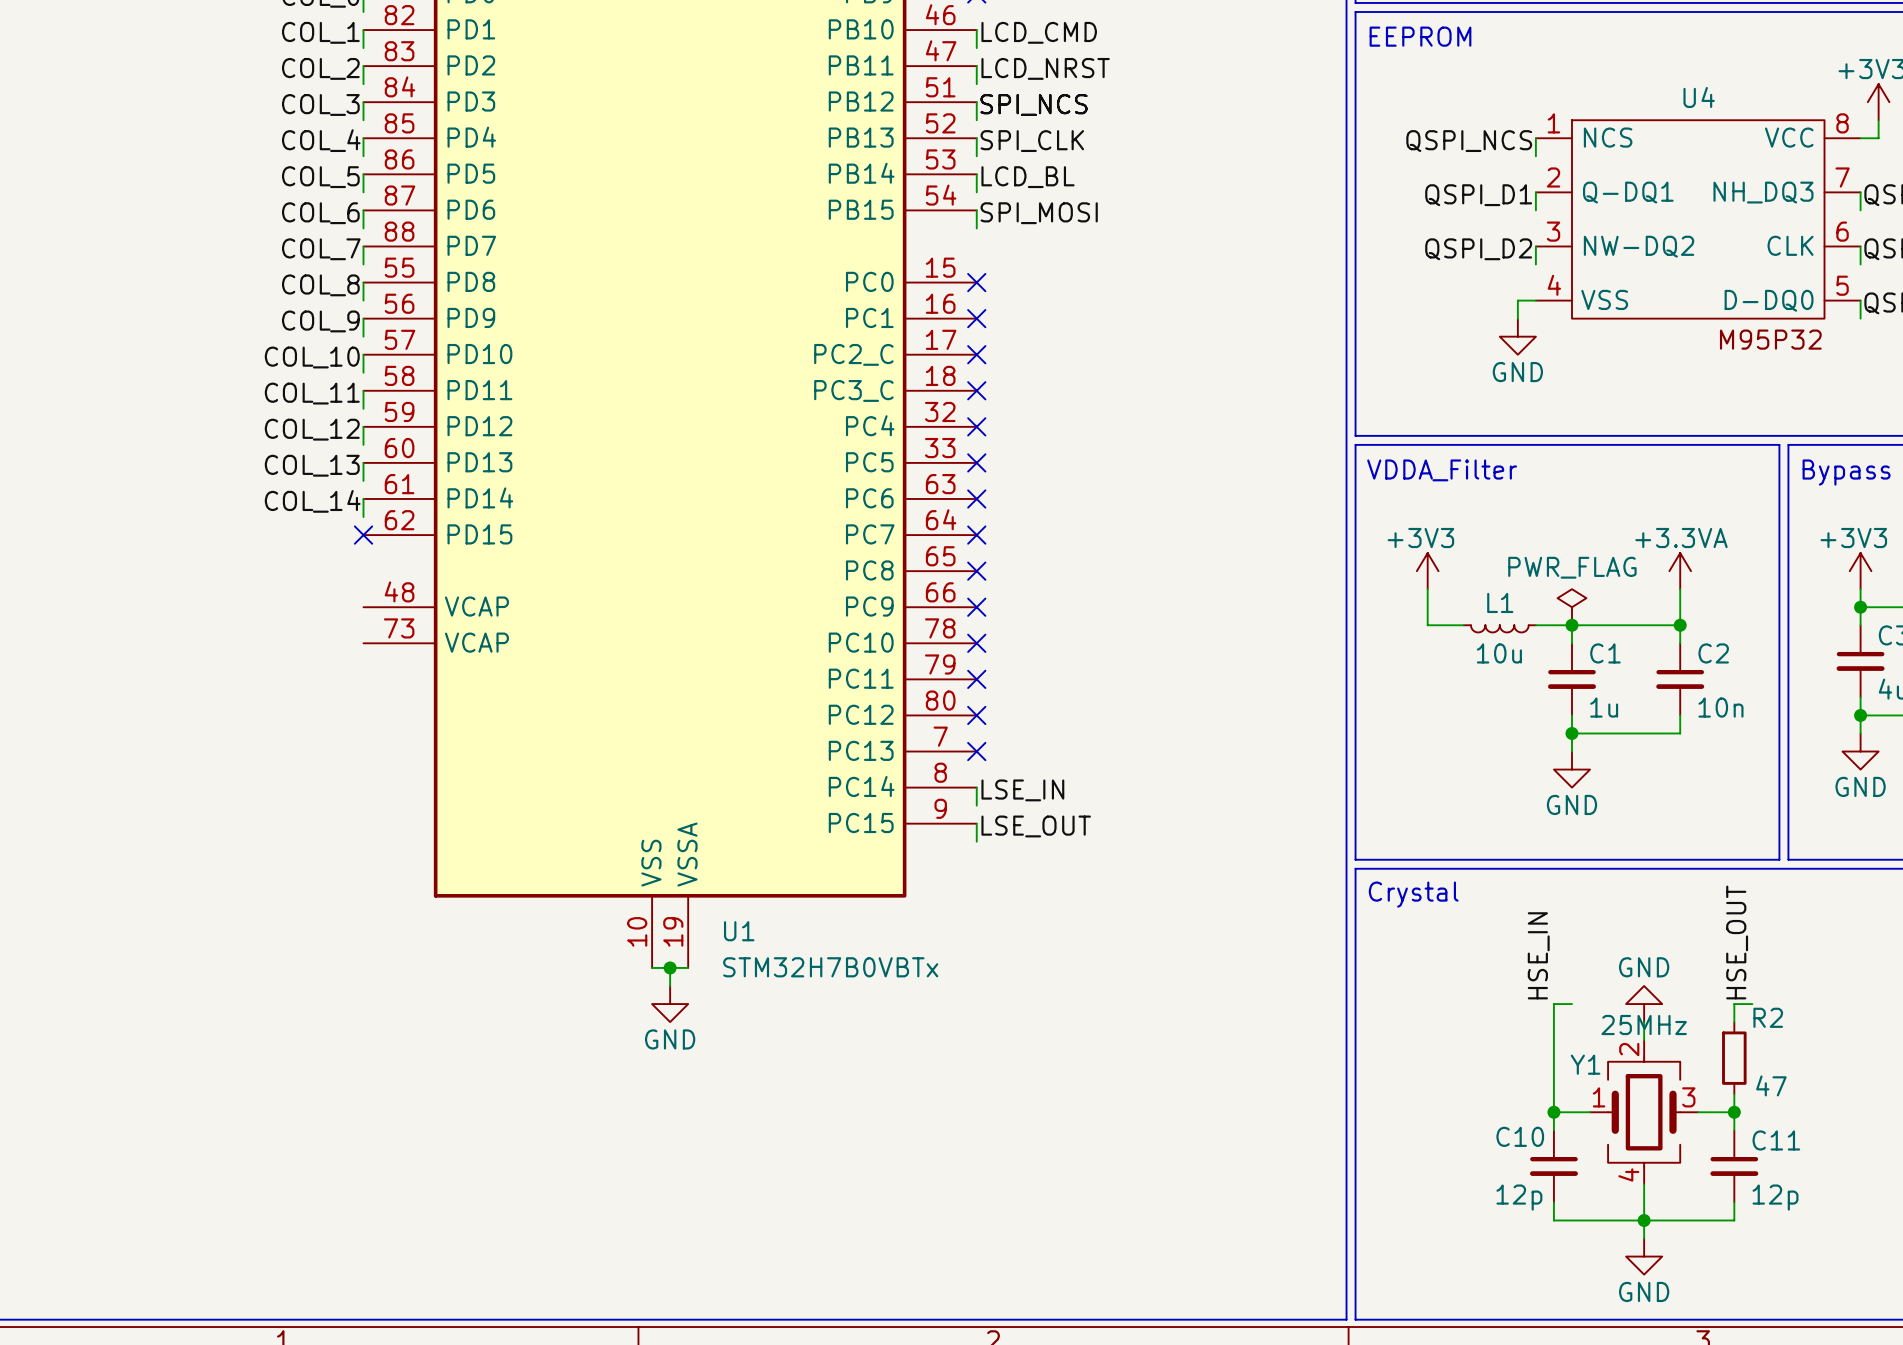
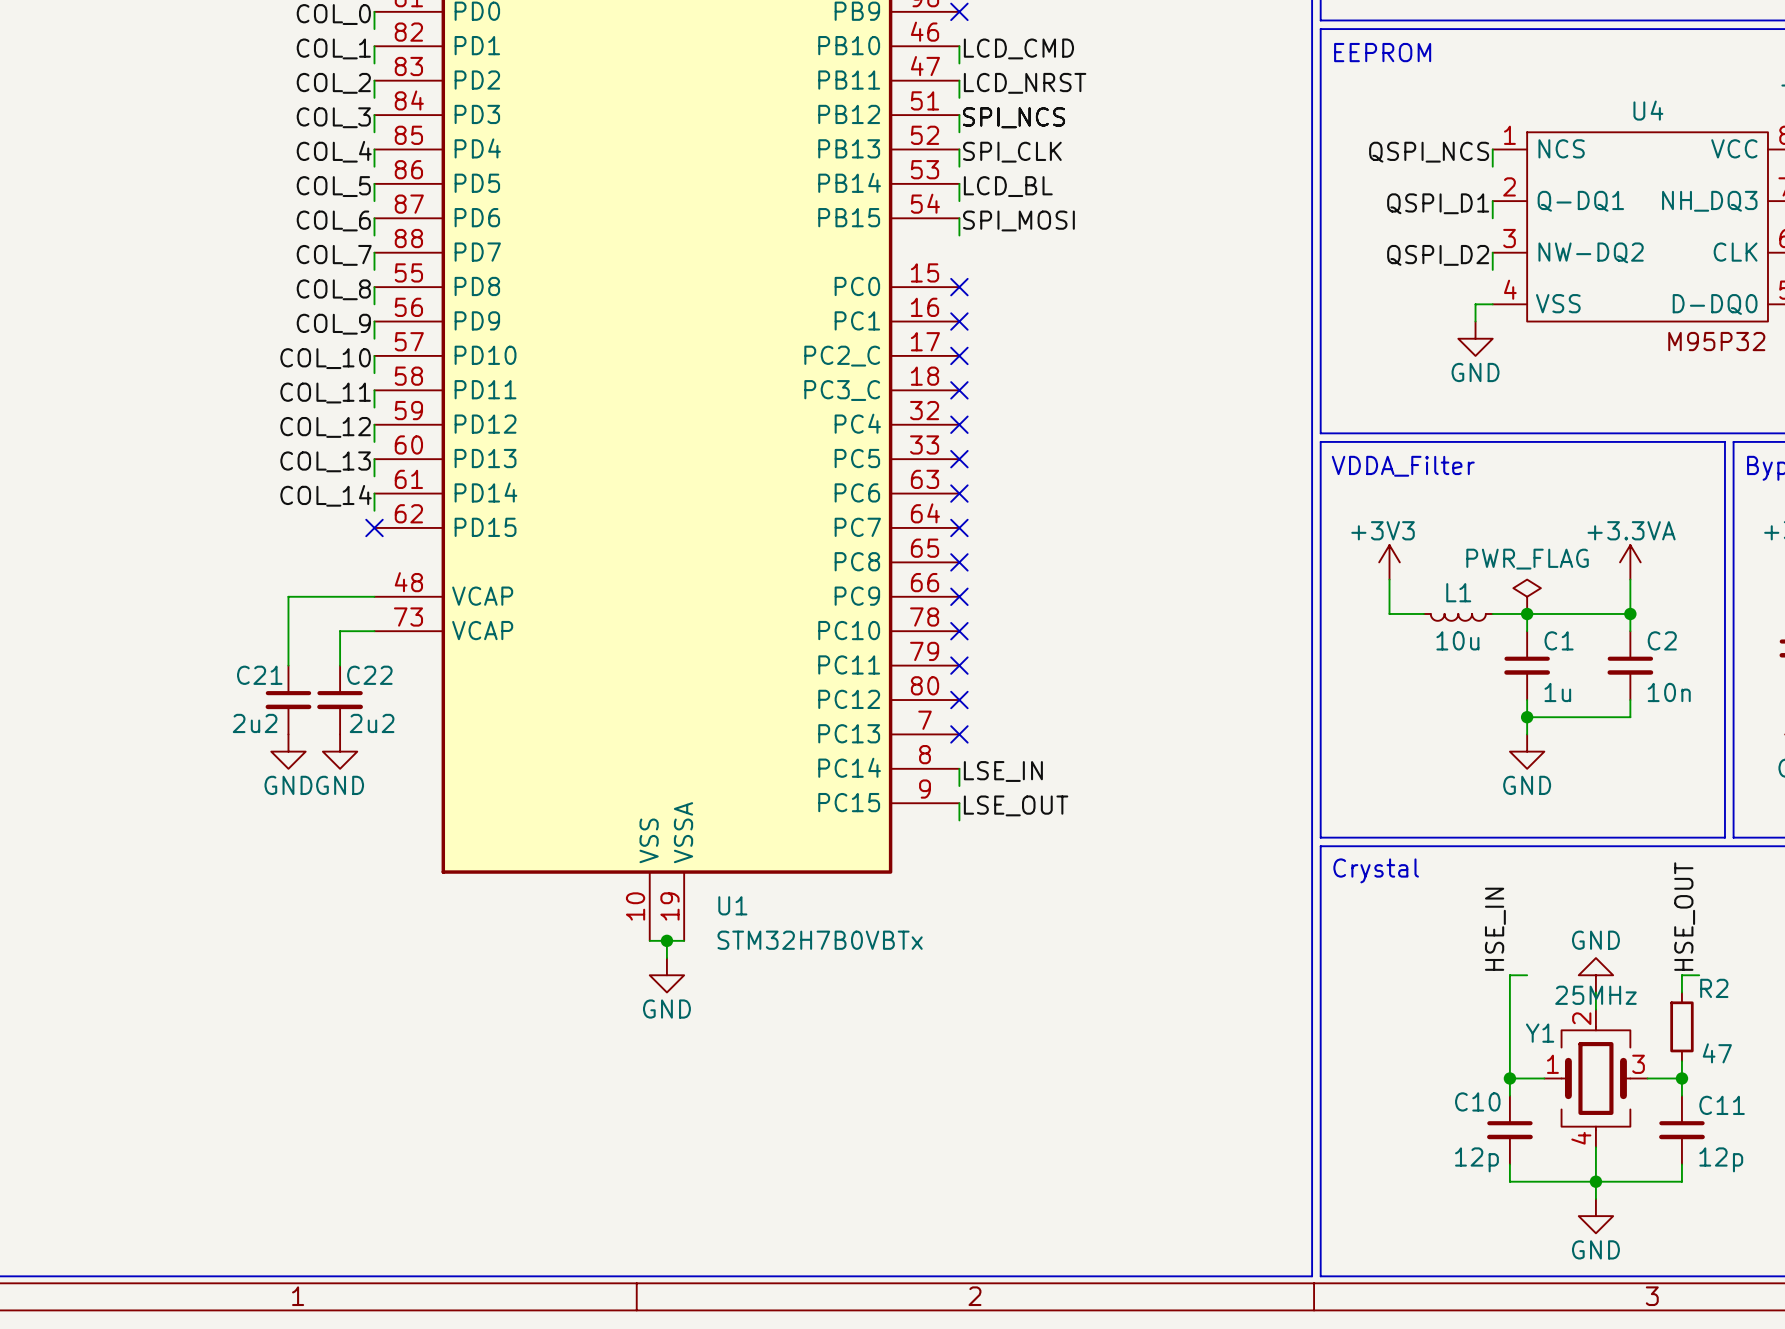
wire: none -> (374, 596) (288, 596) (288, 665)
wire: none -> (374, 631) (340, 631) (340, 665)
C21: none -> 2u2 (288, 700)
C22: none -> 2u2 (340, 700)
power symbol: none -> GND (288, 751)
power symbol: none -> GND (340, 751)

